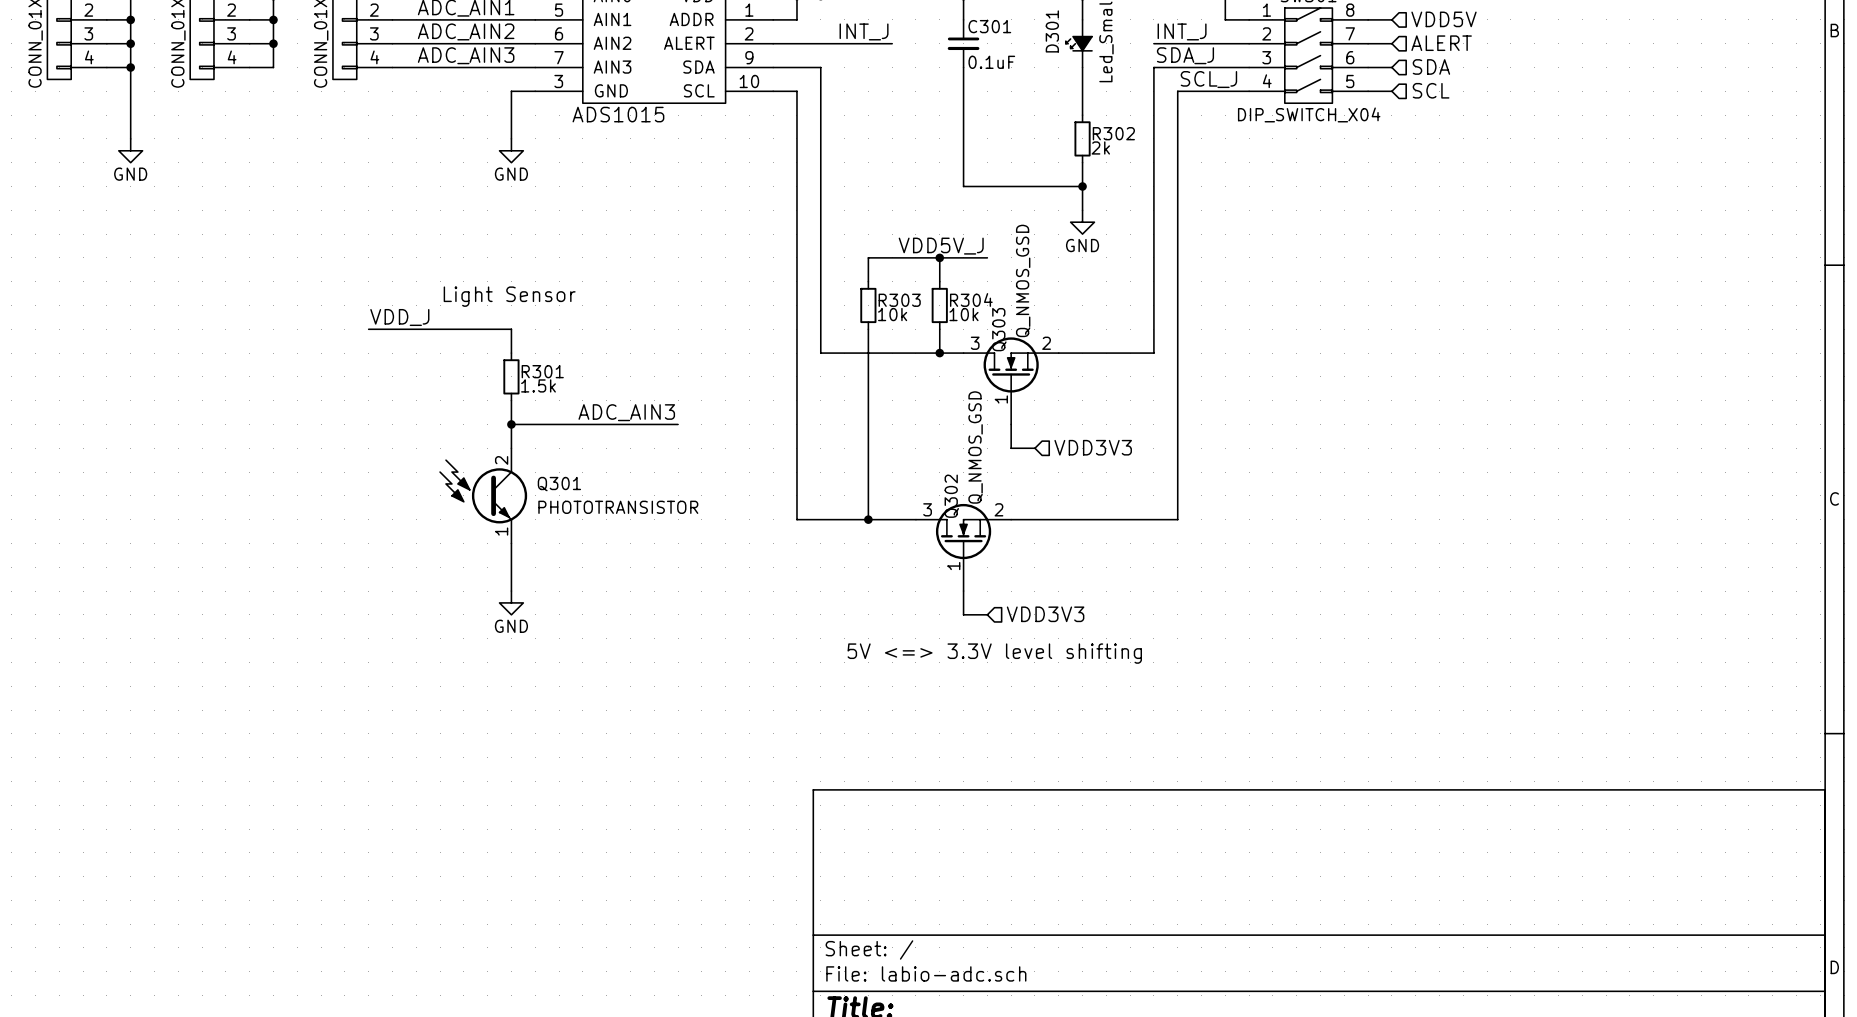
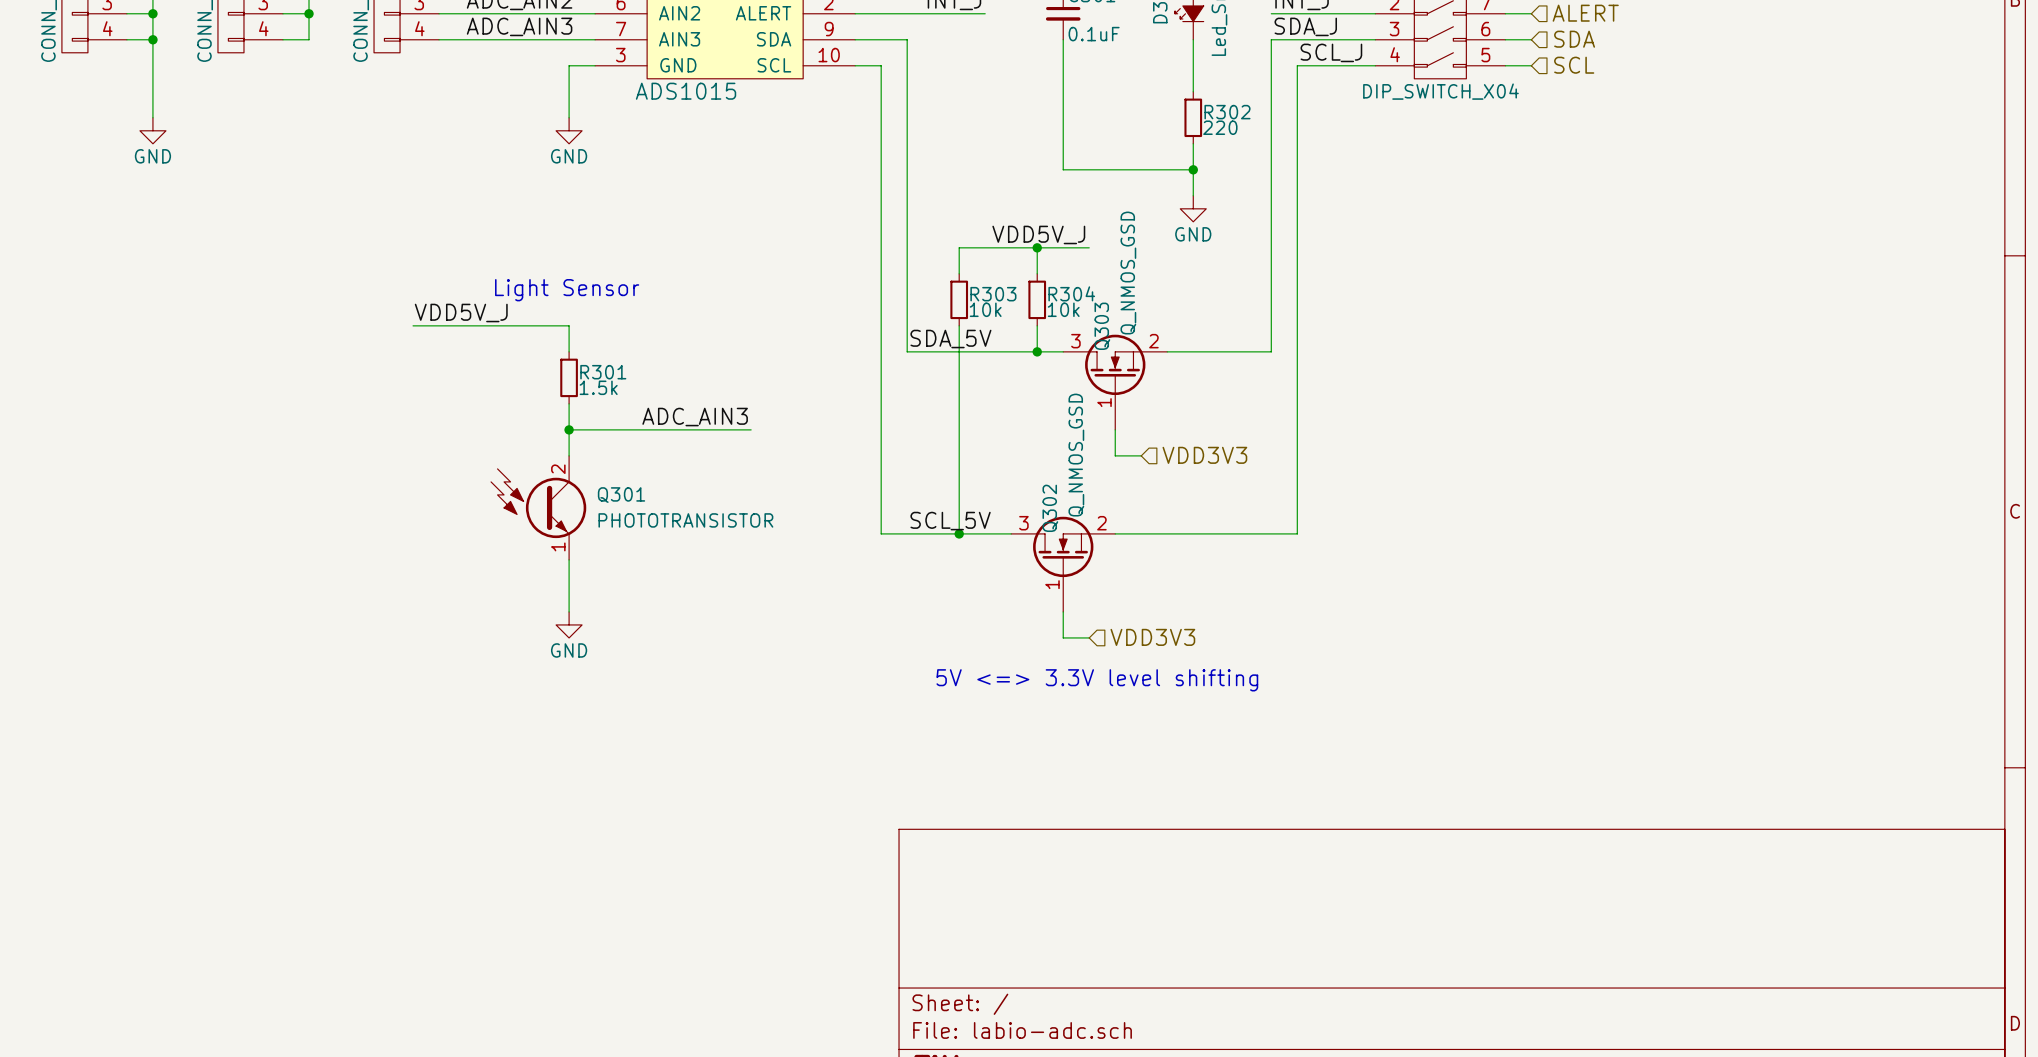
R302 value: 2k (1100, 147) -> 220 (1220, 127)
label: VDD_J (399, 317) -> VDD5V_J (461, 313)
label: none -> SDA_5V (950, 339)
label: none -> SCL_5V (950, 521)

